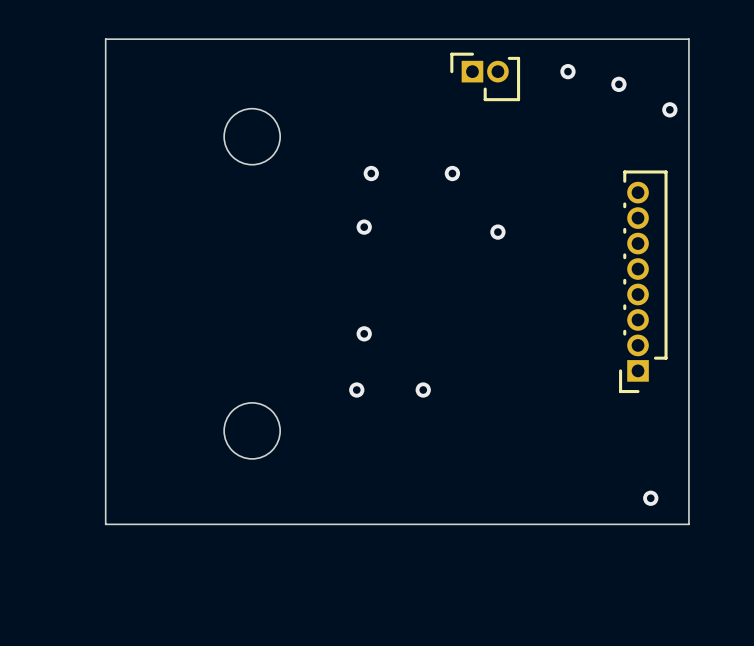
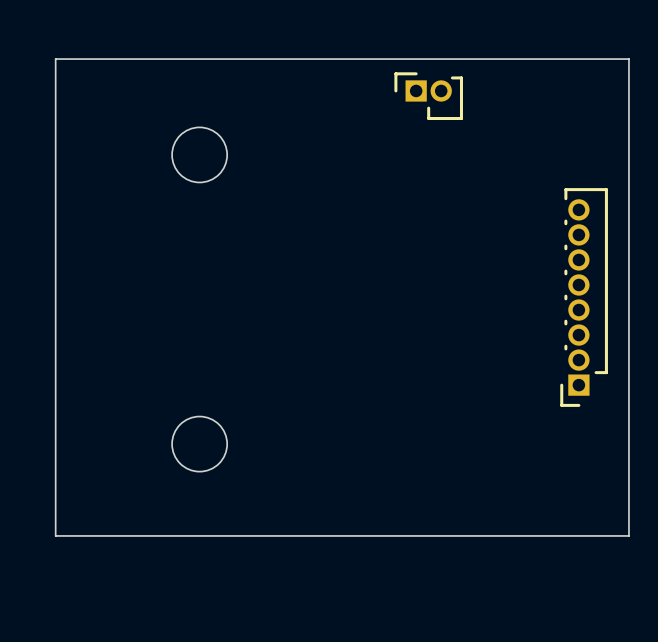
via: (567, 71) -> none
via: (618, 84) -> none
via: (669, 109) -> none
via: (371, 173) -> none
via: (452, 173) -> none
via: (364, 227) -> none
via: (497, 232) -> none
via: (364, 333) -> none
via: (356, 390) -> none
via: (423, 390) -> none
via: (650, 498) -> none

